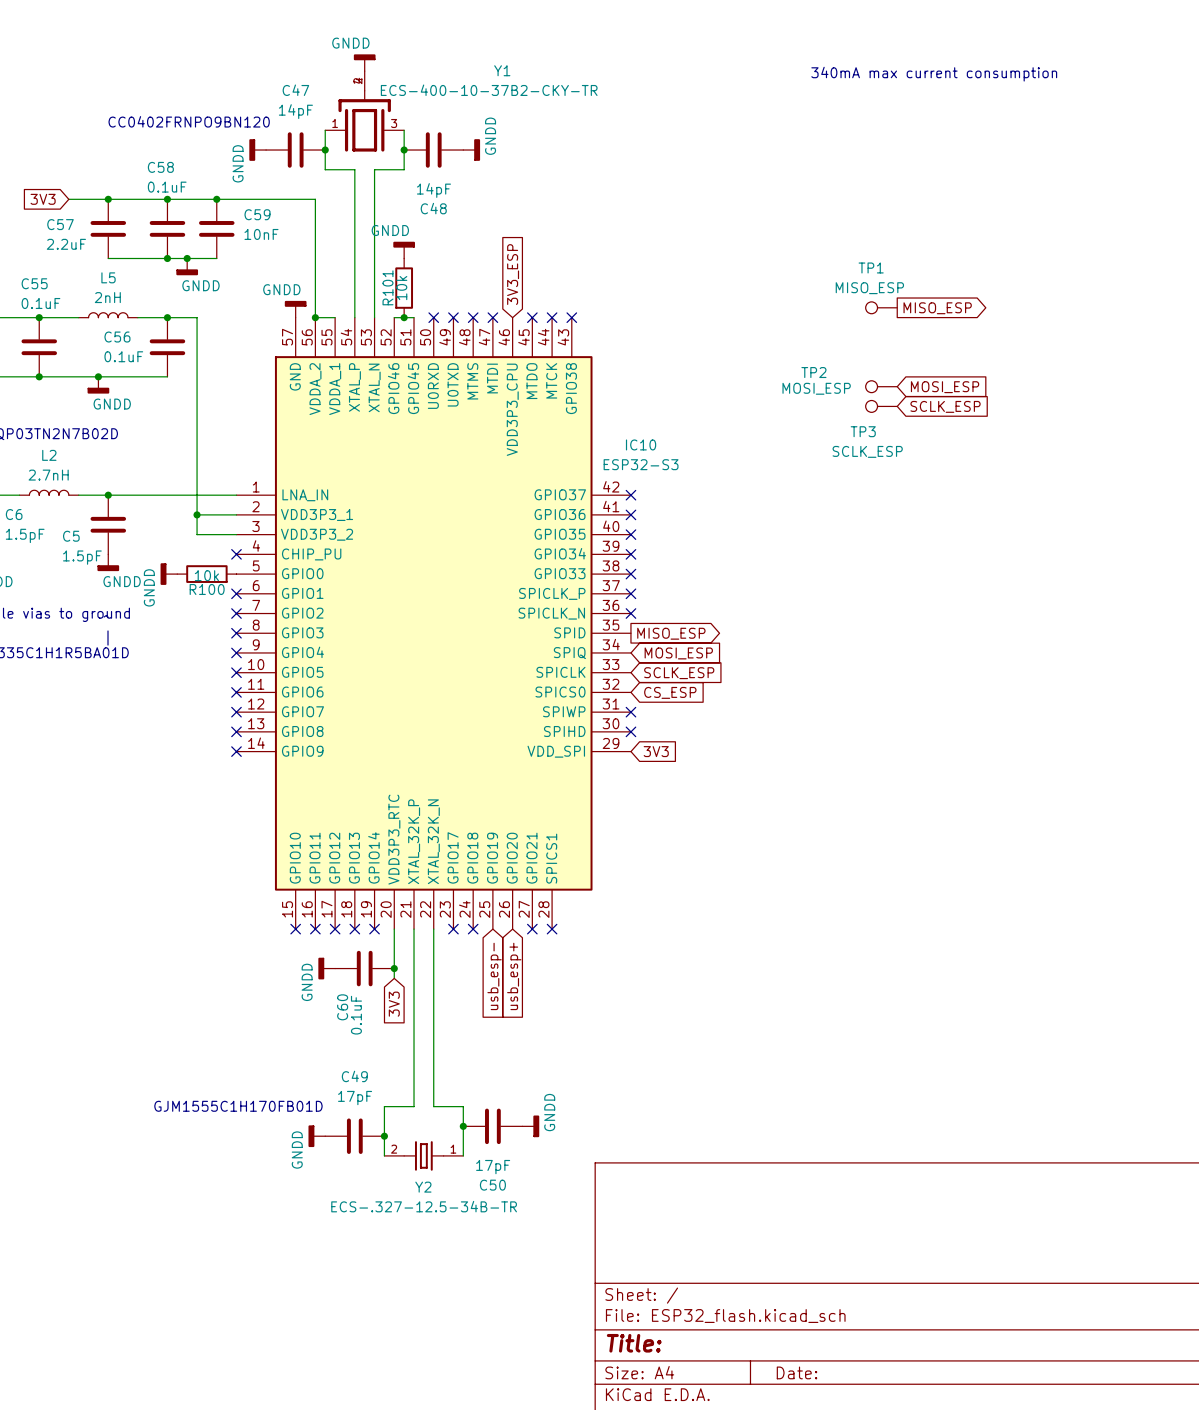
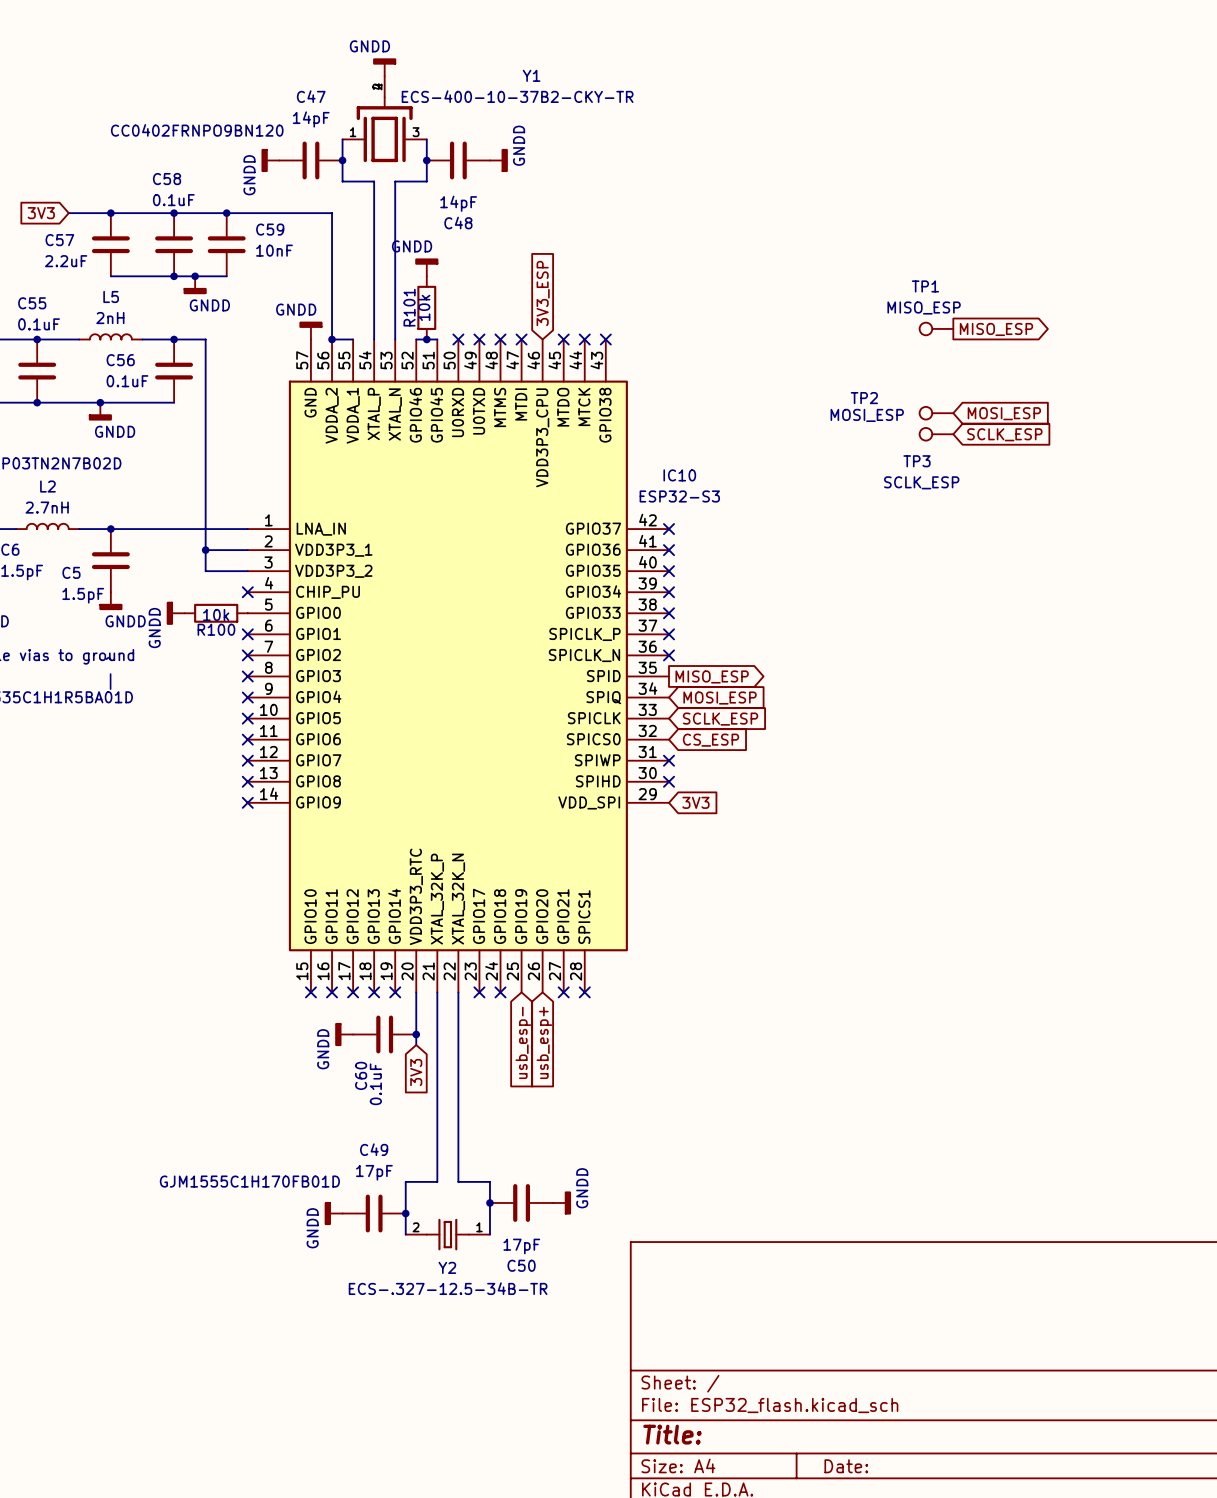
text: 340mA max current consumption (934, 74) -> none

